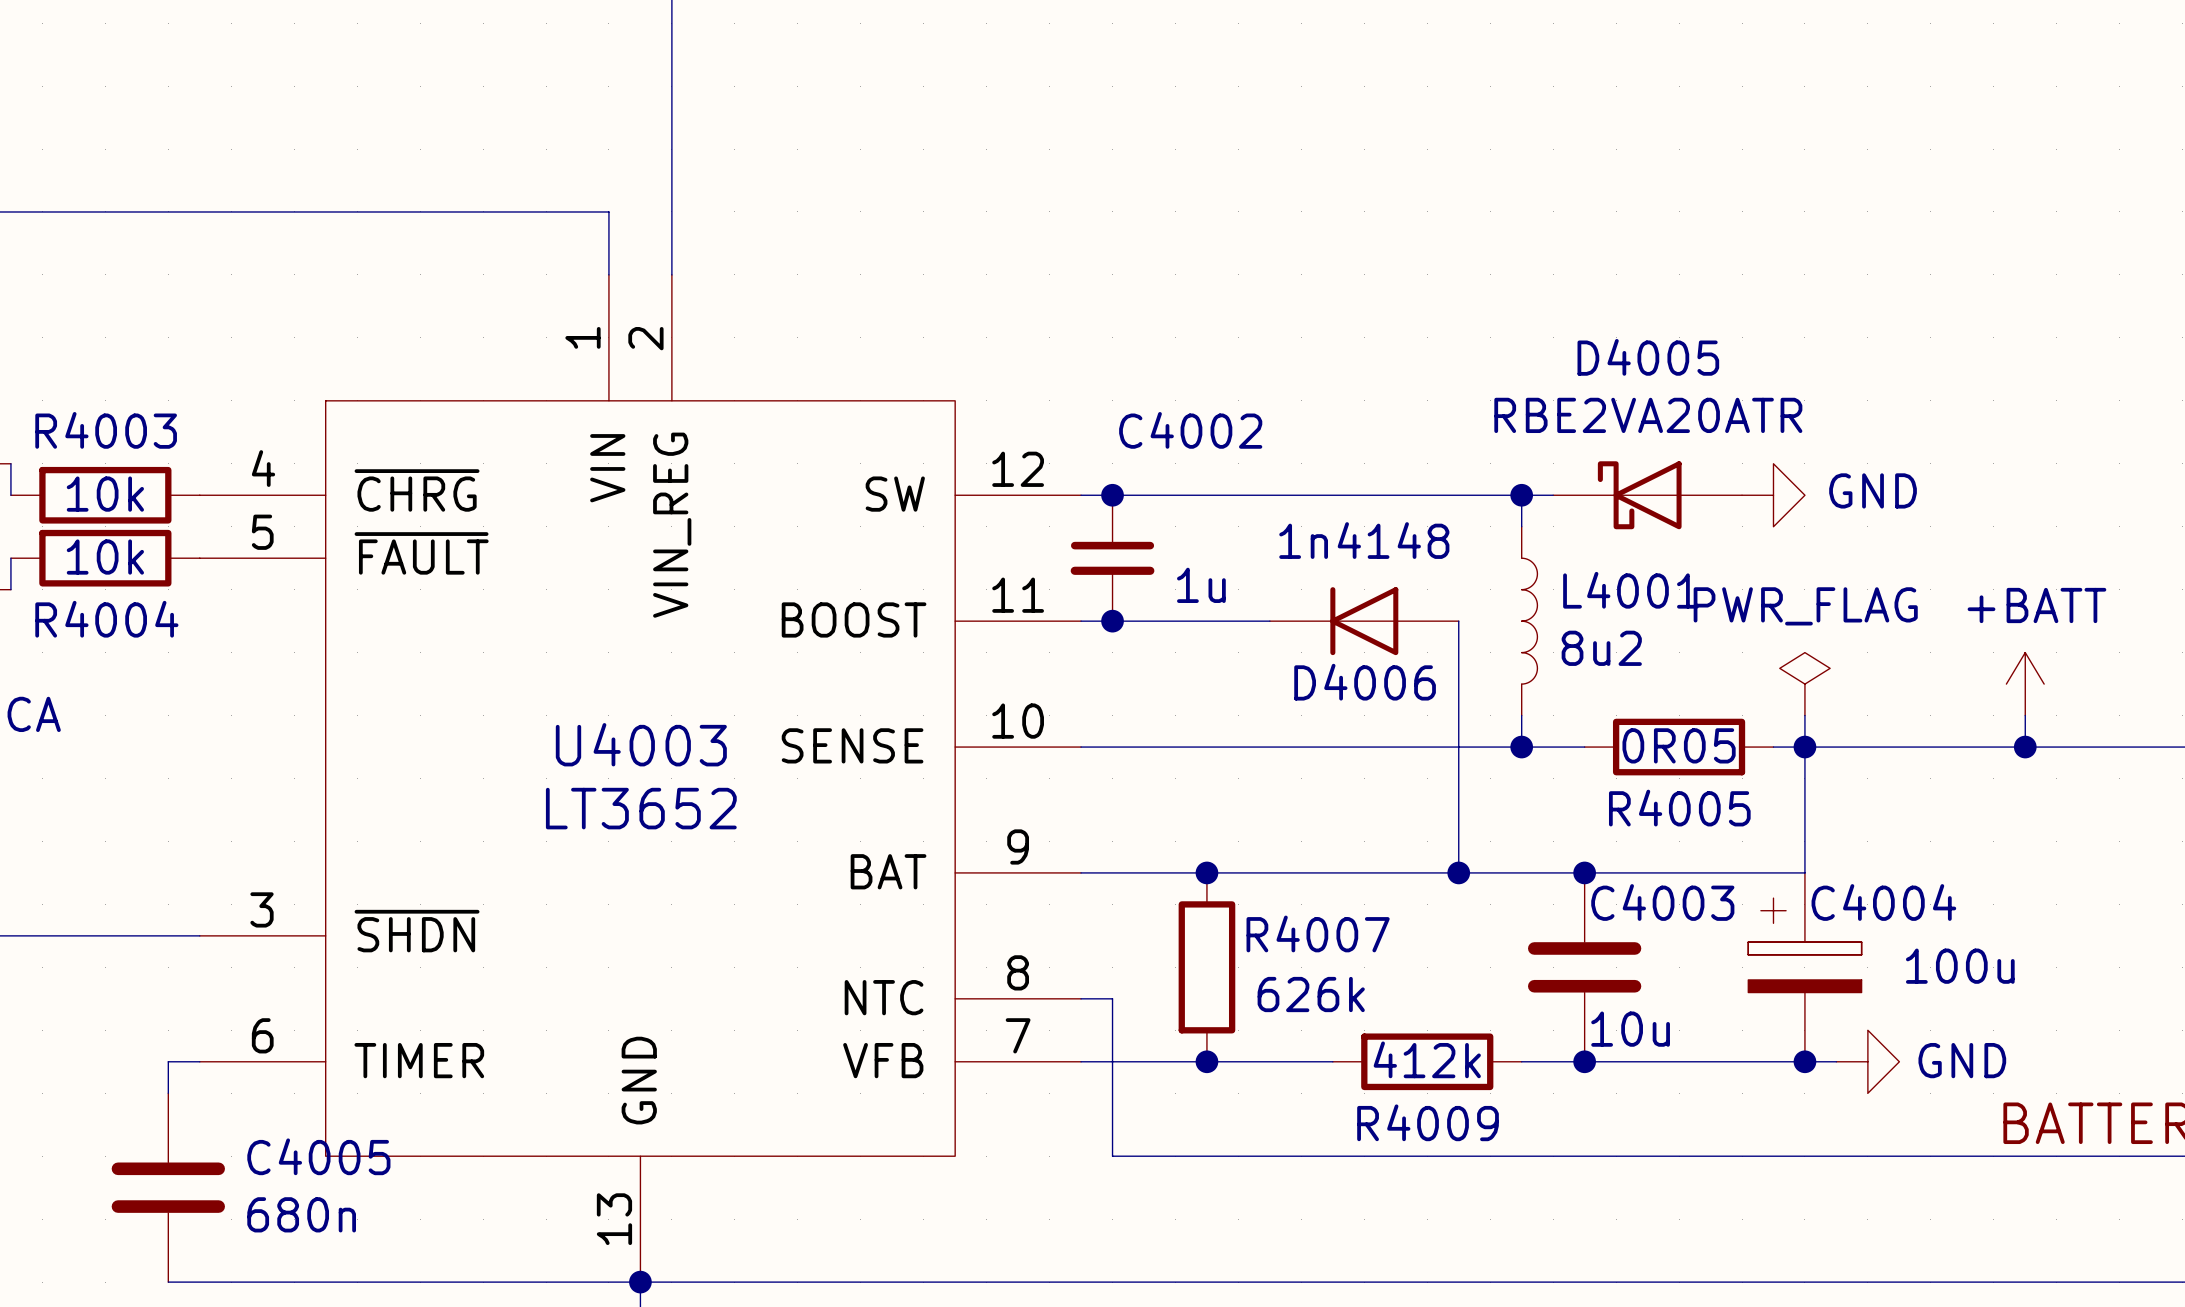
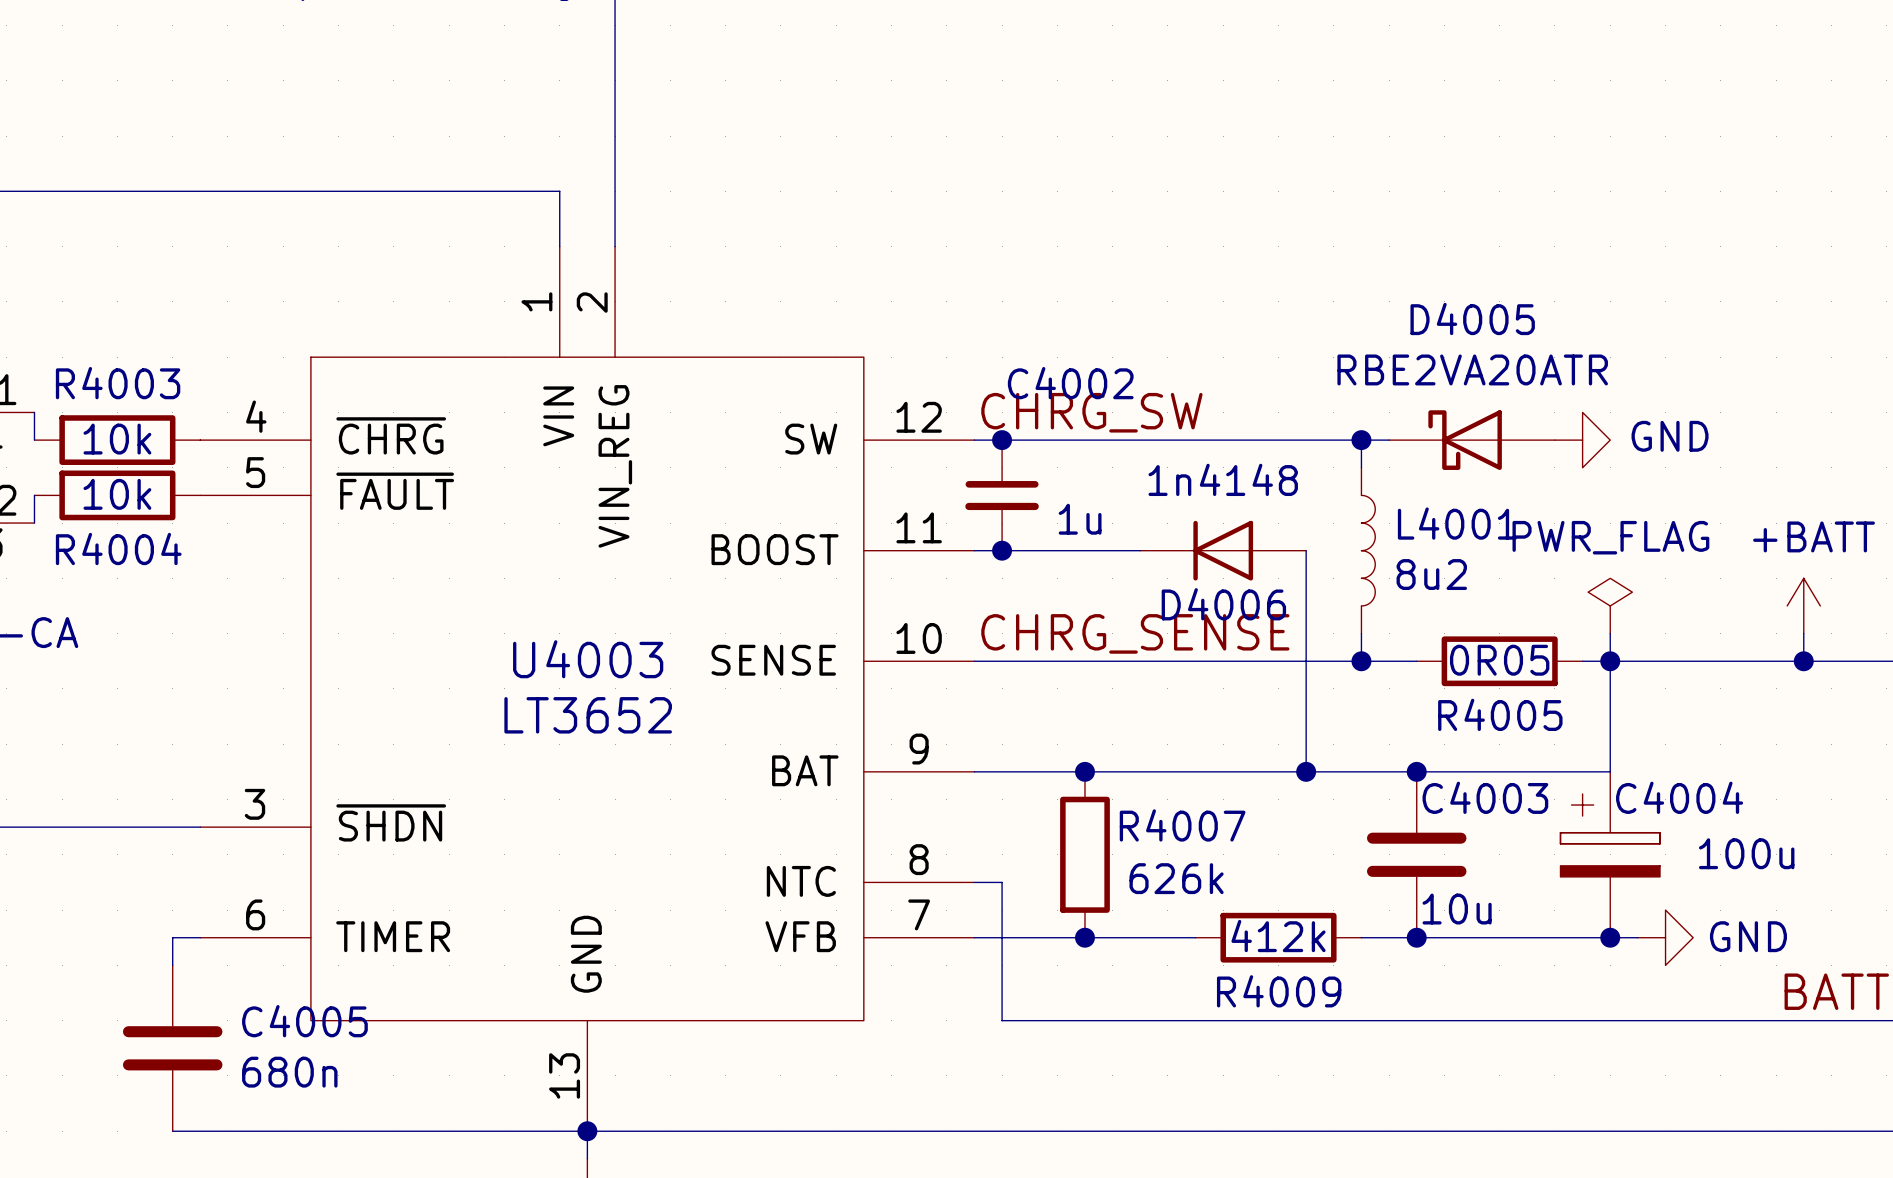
label: none -> CHRG_SW (1091, 412)
label: none -> CHRG_SENSE (1135, 633)

